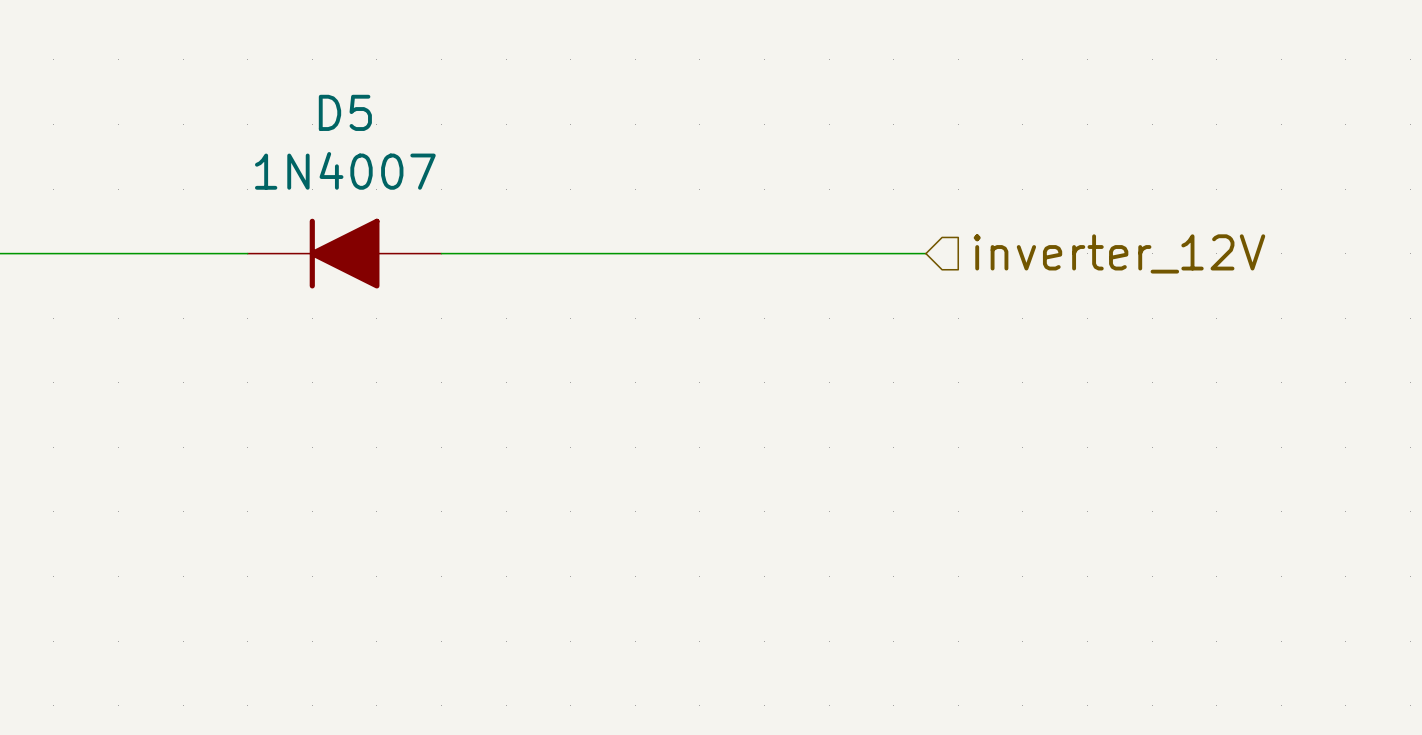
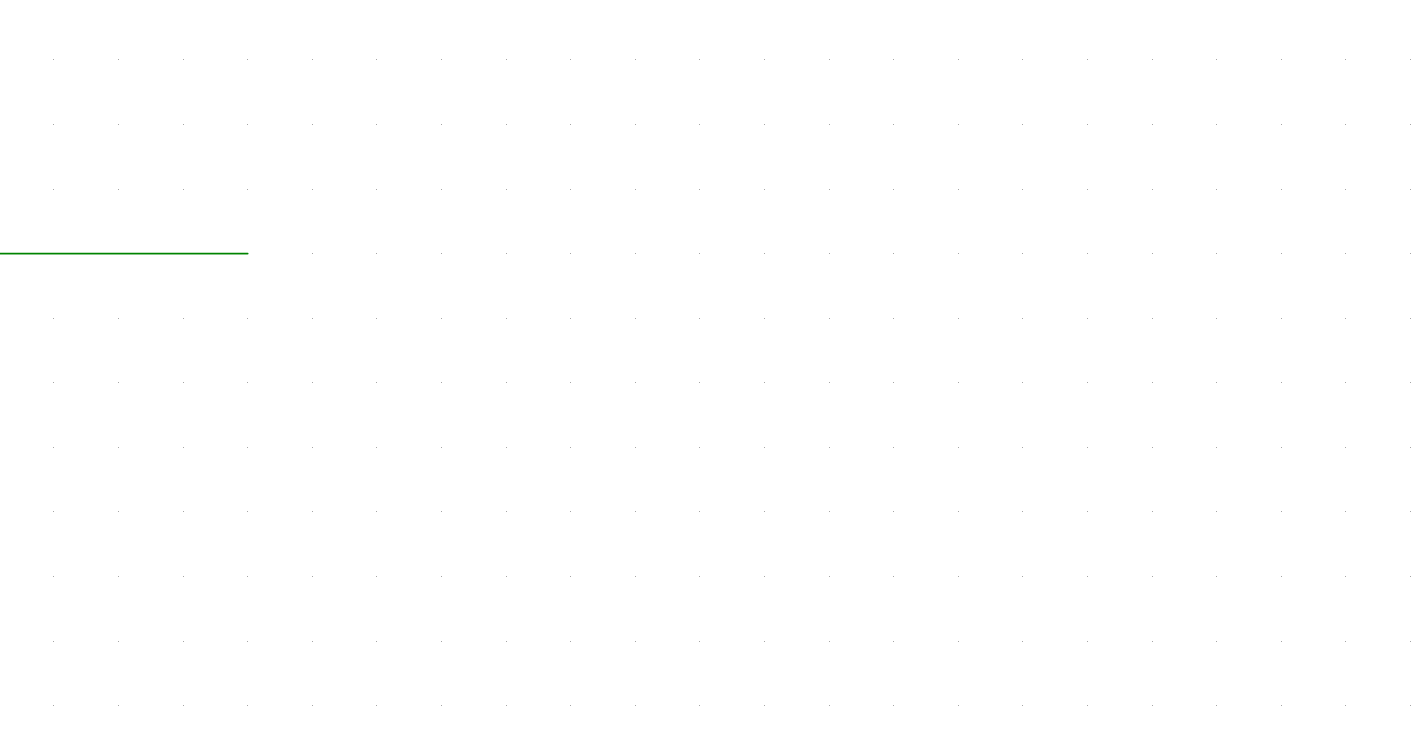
D5: 1N4007 (344, 253) -> none
wire: (441, 253) (925, 253) -> none
hierarchical label: inverter_12V (1119, 253) -> none

